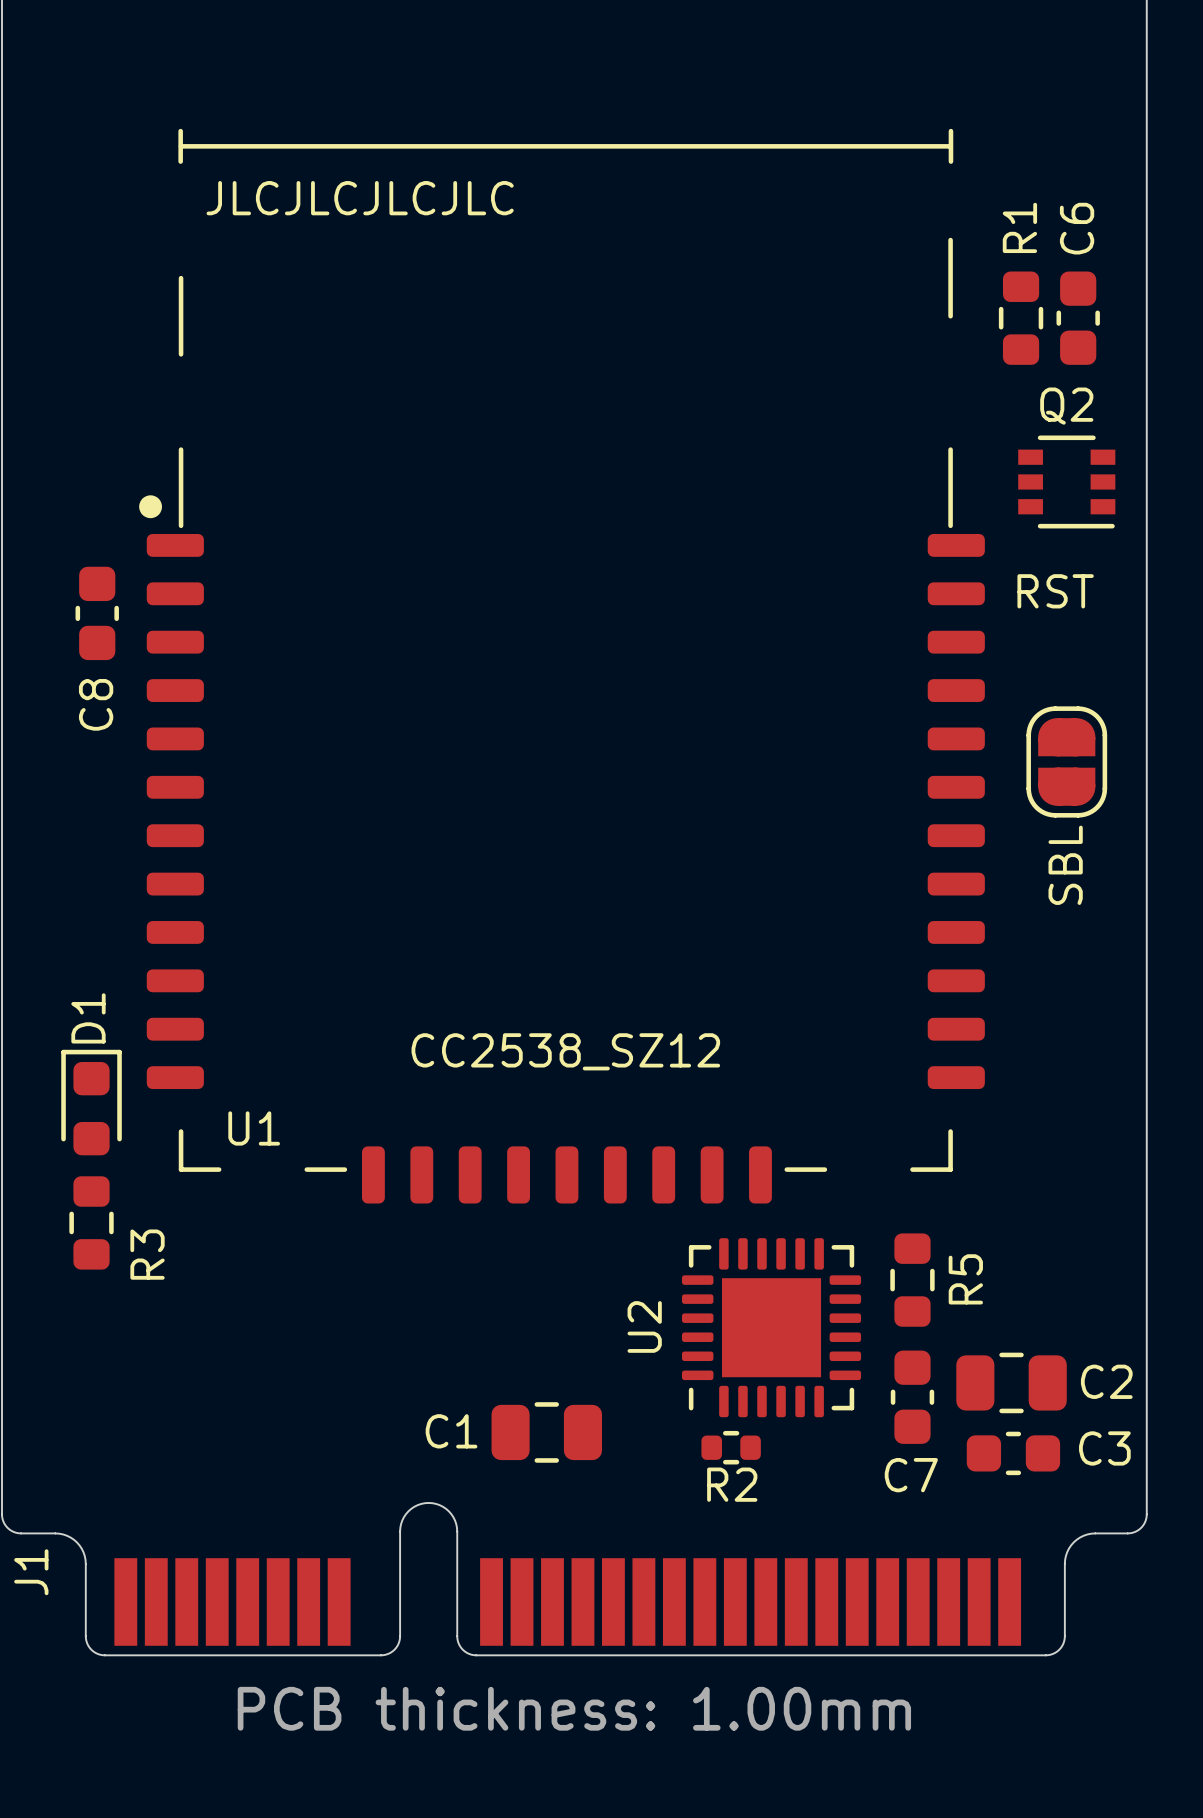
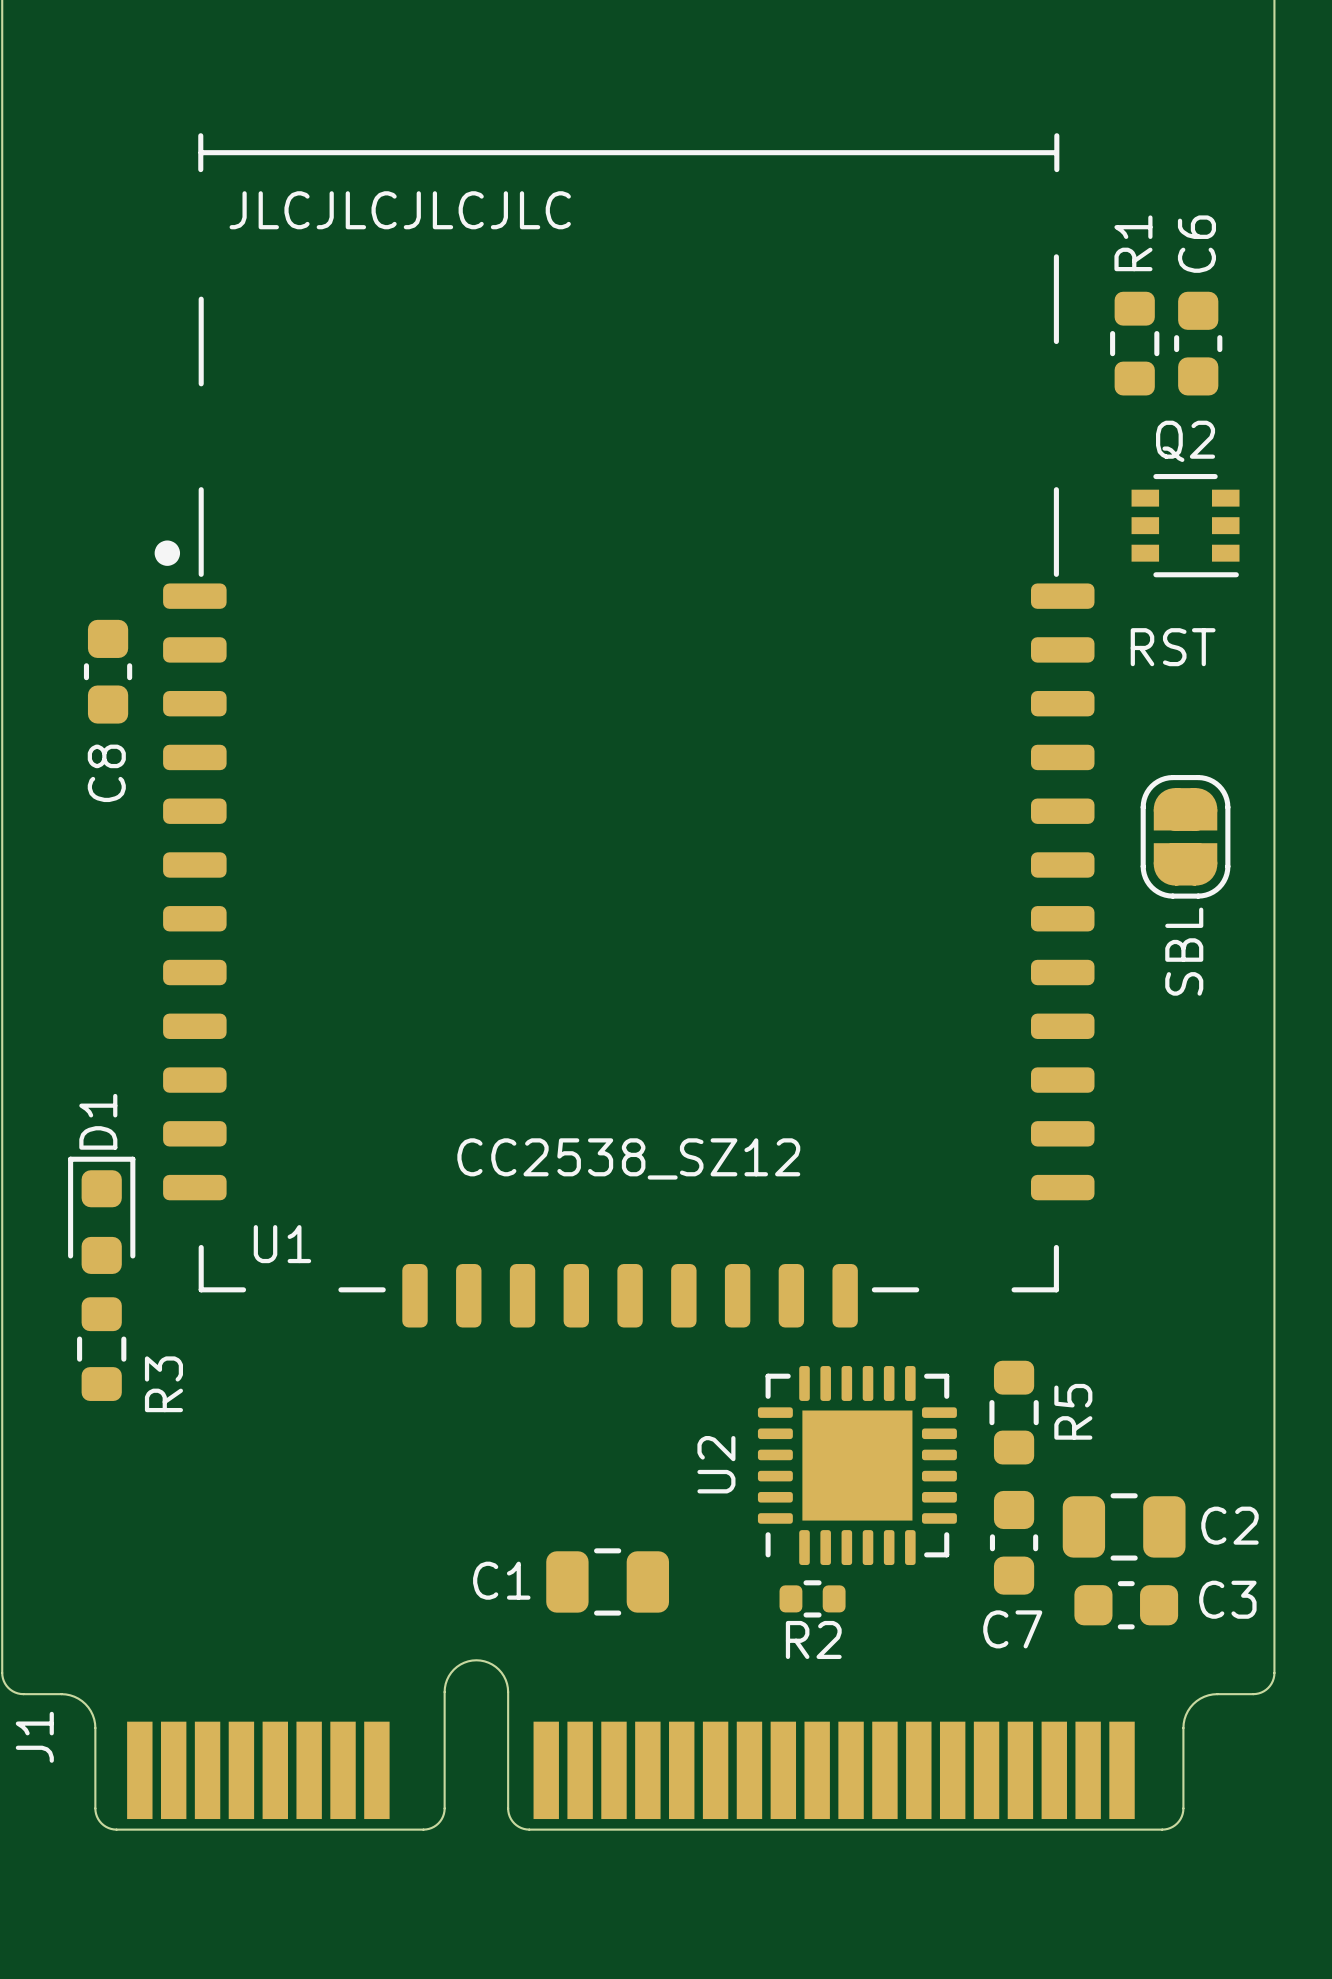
text: PCB thickness: 1.00mm (574, 1708) -> none

